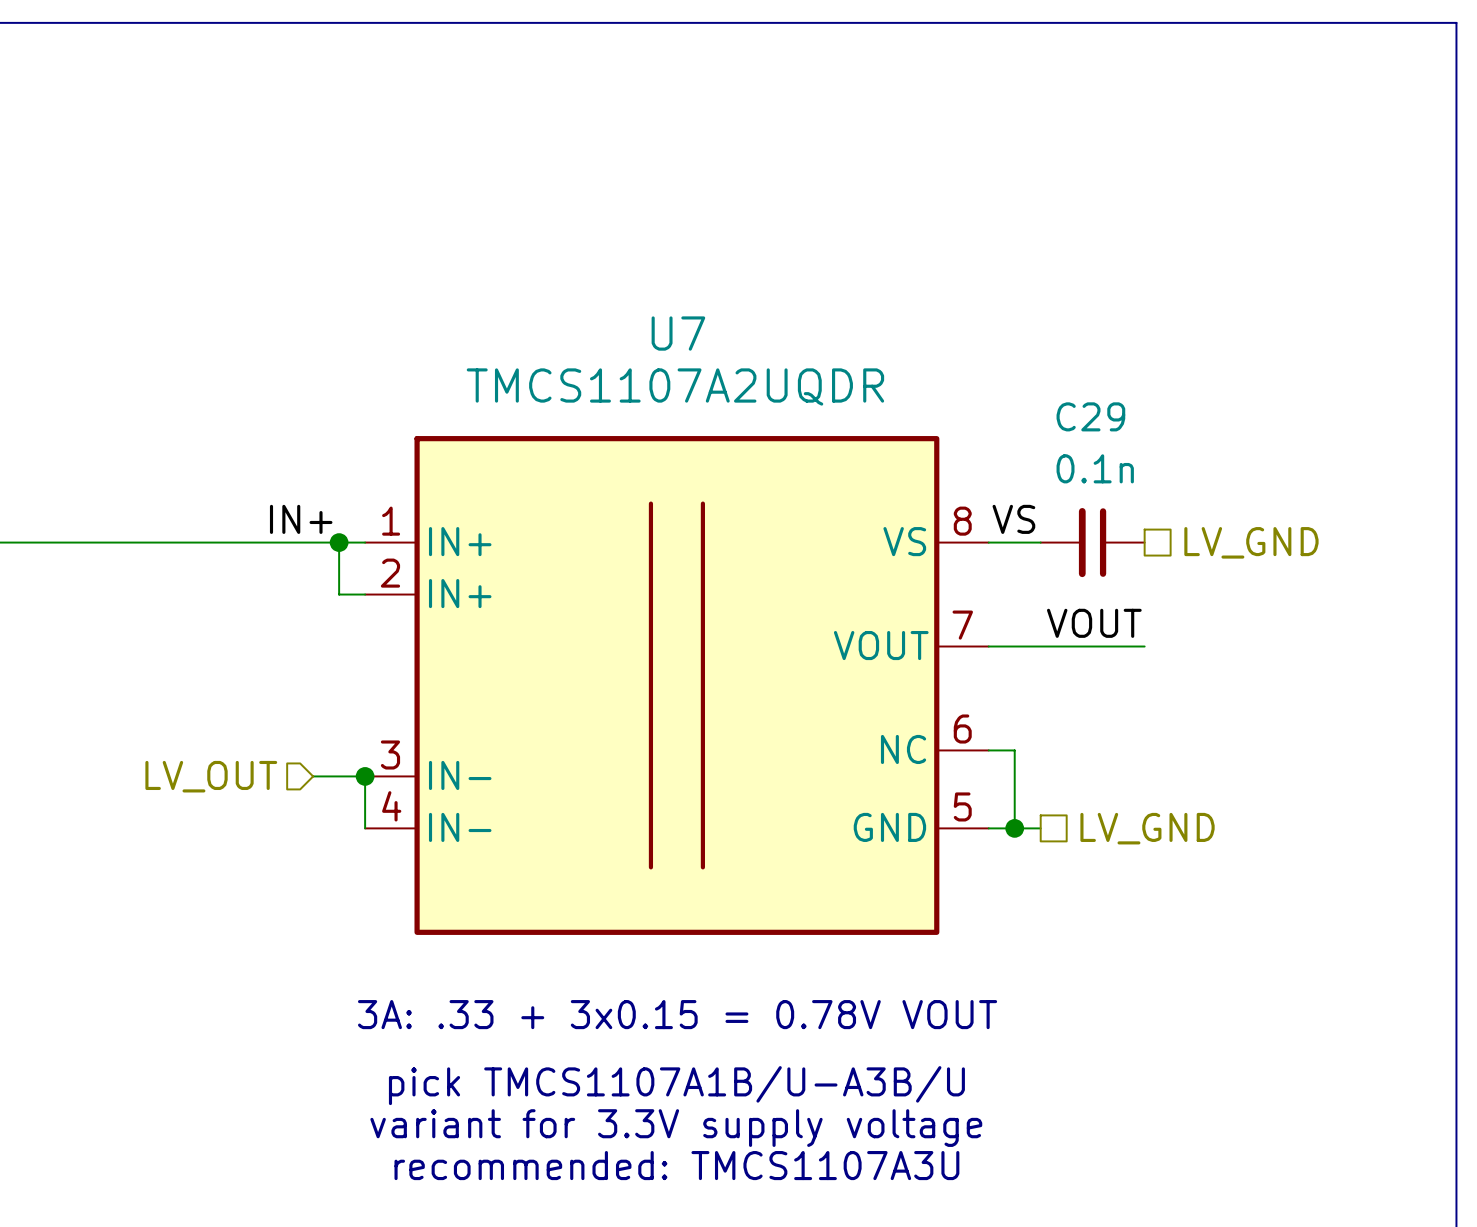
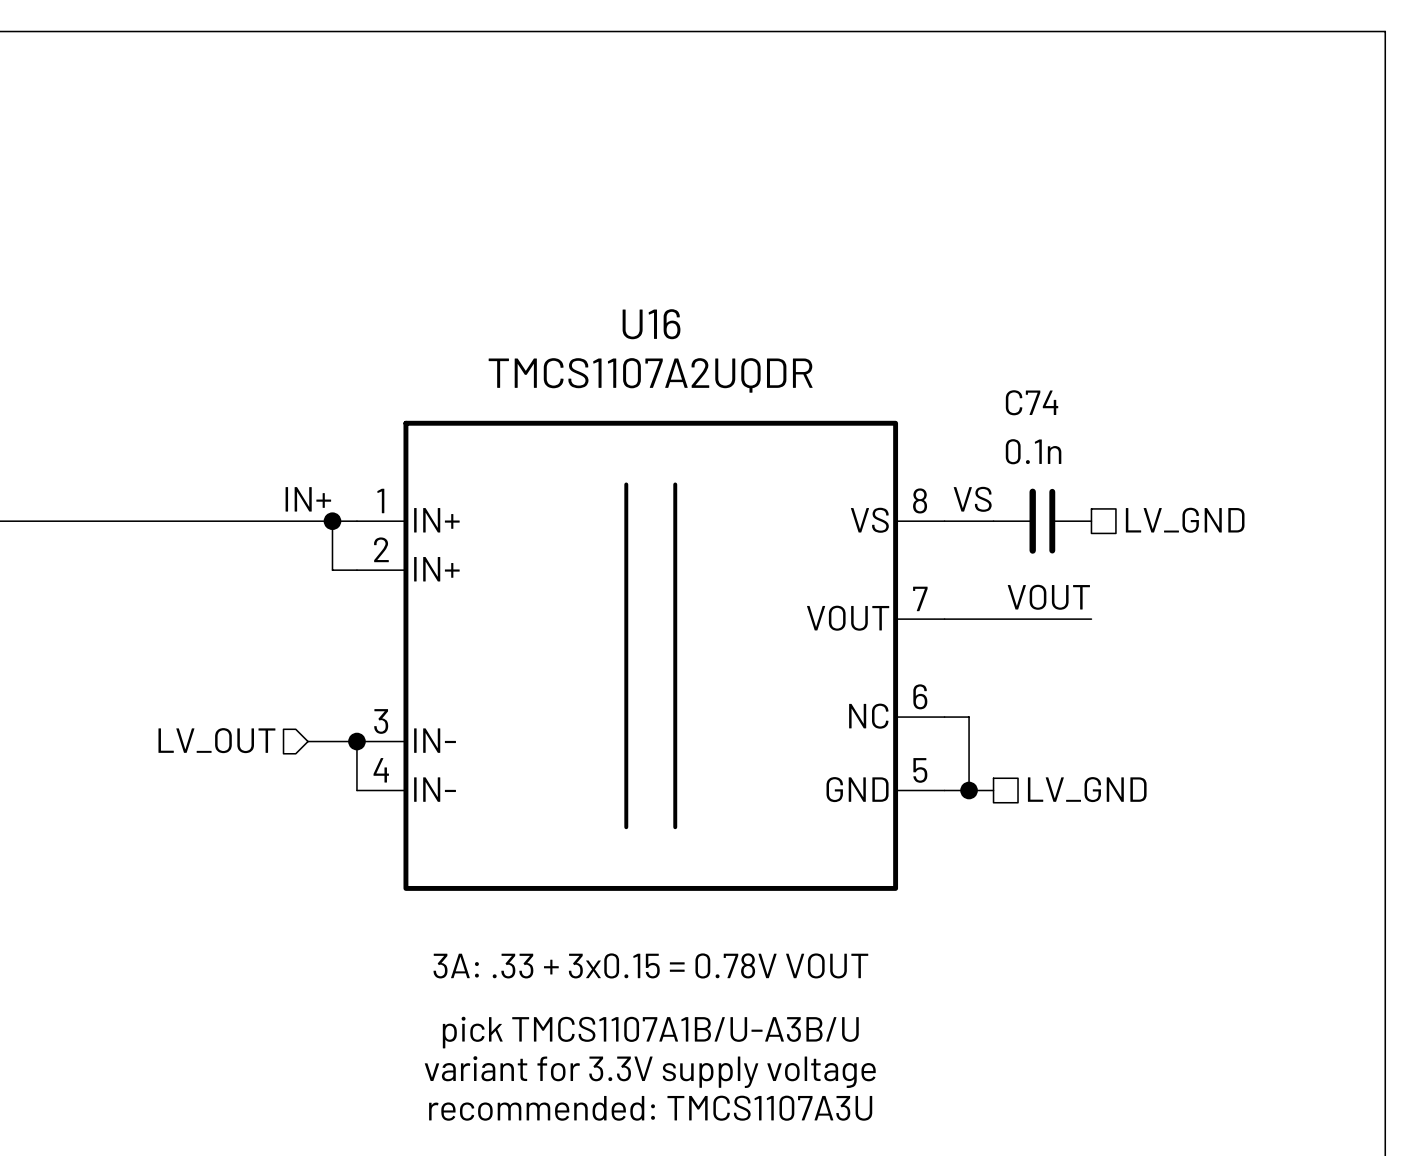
U7 name: U7 (678, 333) -> U16 (651, 324)
C29 name: C29 (1090, 416) -> C74 (1032, 402)

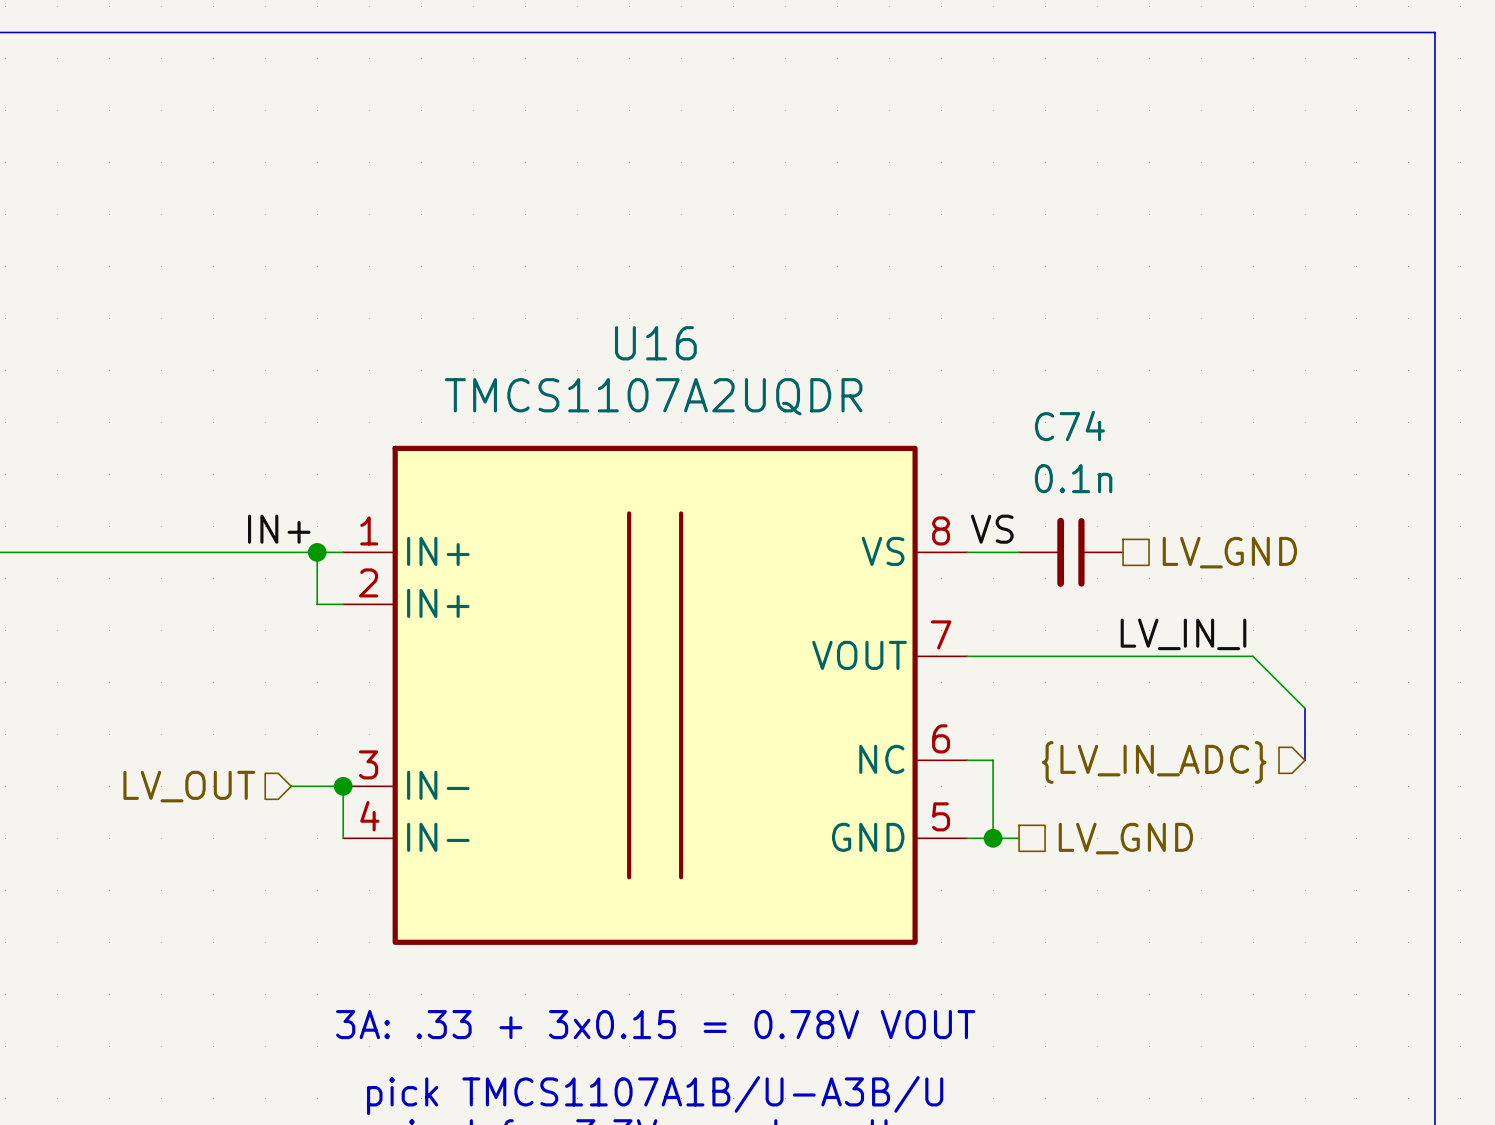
label: VOUT (1048, 597) -> none
label: none -> LV_IN_I (1183, 634)
wire: none -> (1123, 656) (1253, 656) (1305, 708)
bus: none -> (1305, 708) (1305, 760)
hierarchical label: none -> {LV_IN_ADC} (1154, 762)

